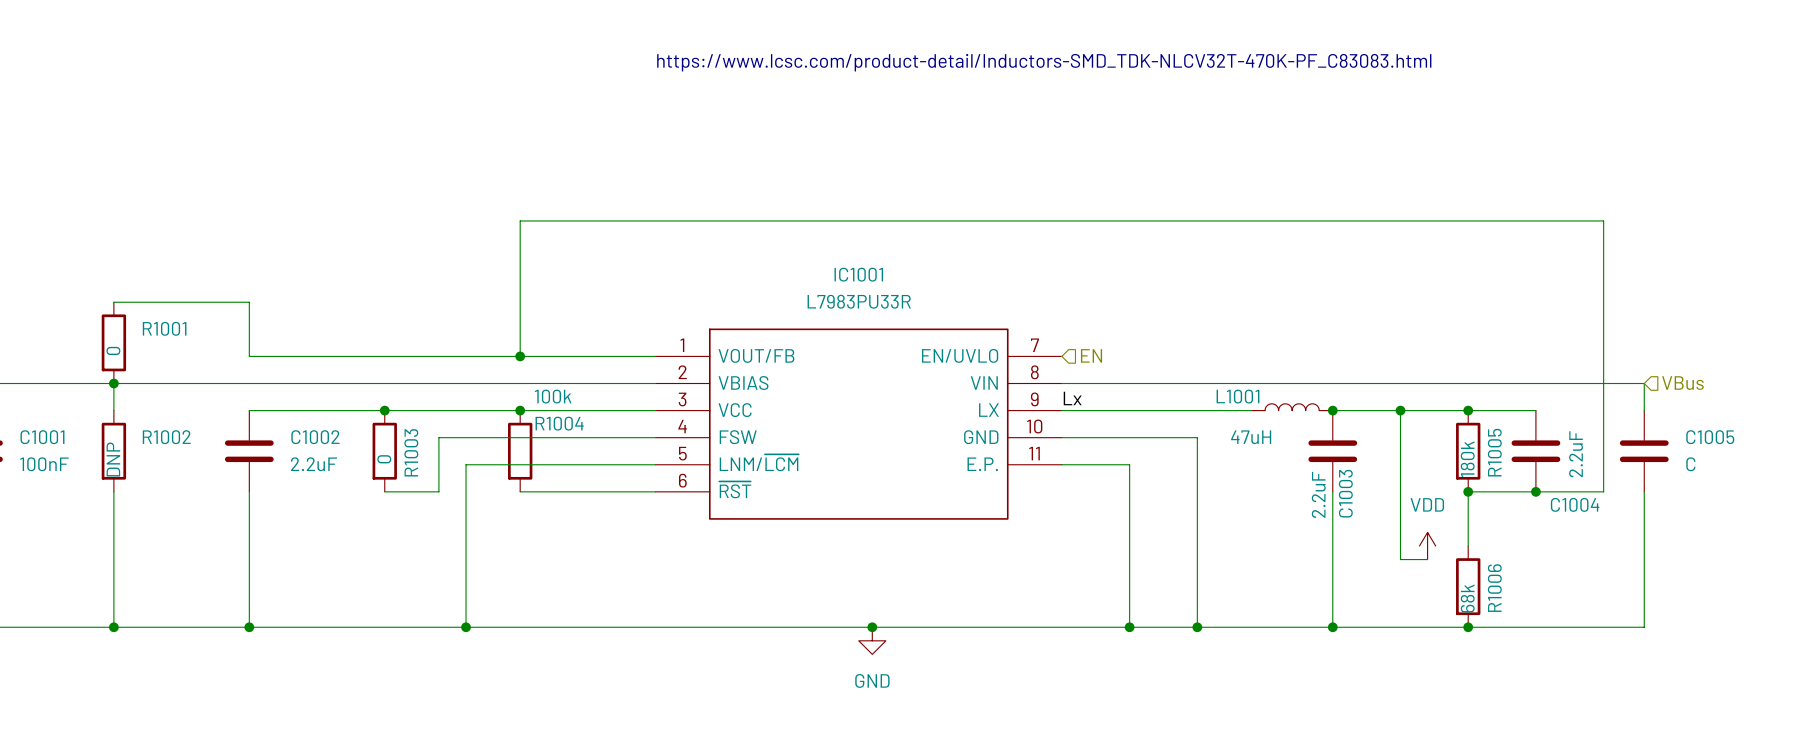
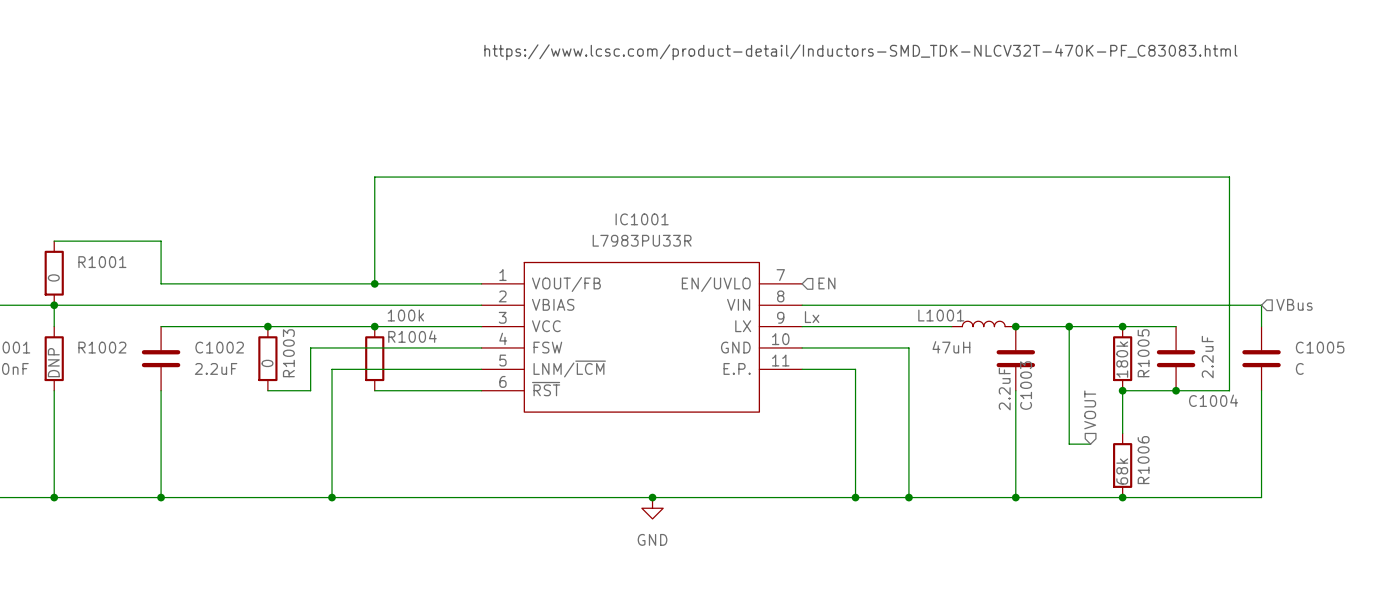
hierarchical label: none -> VOUT (1090, 409)
power symbol: VDD (1427, 546) -> none

